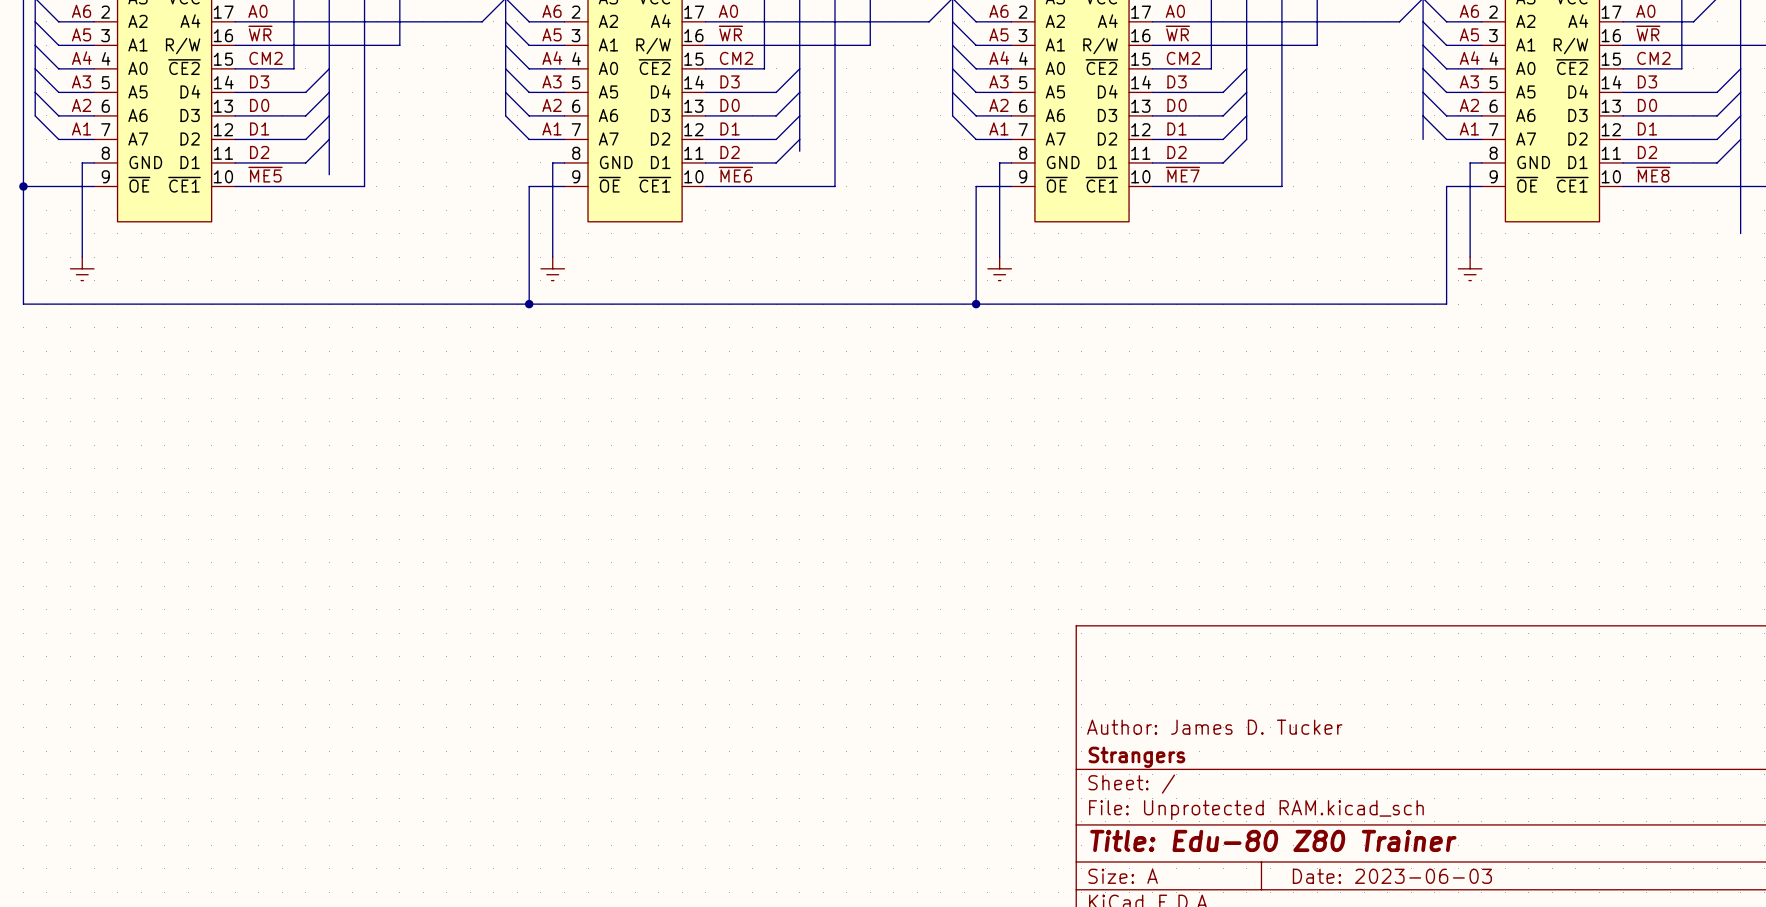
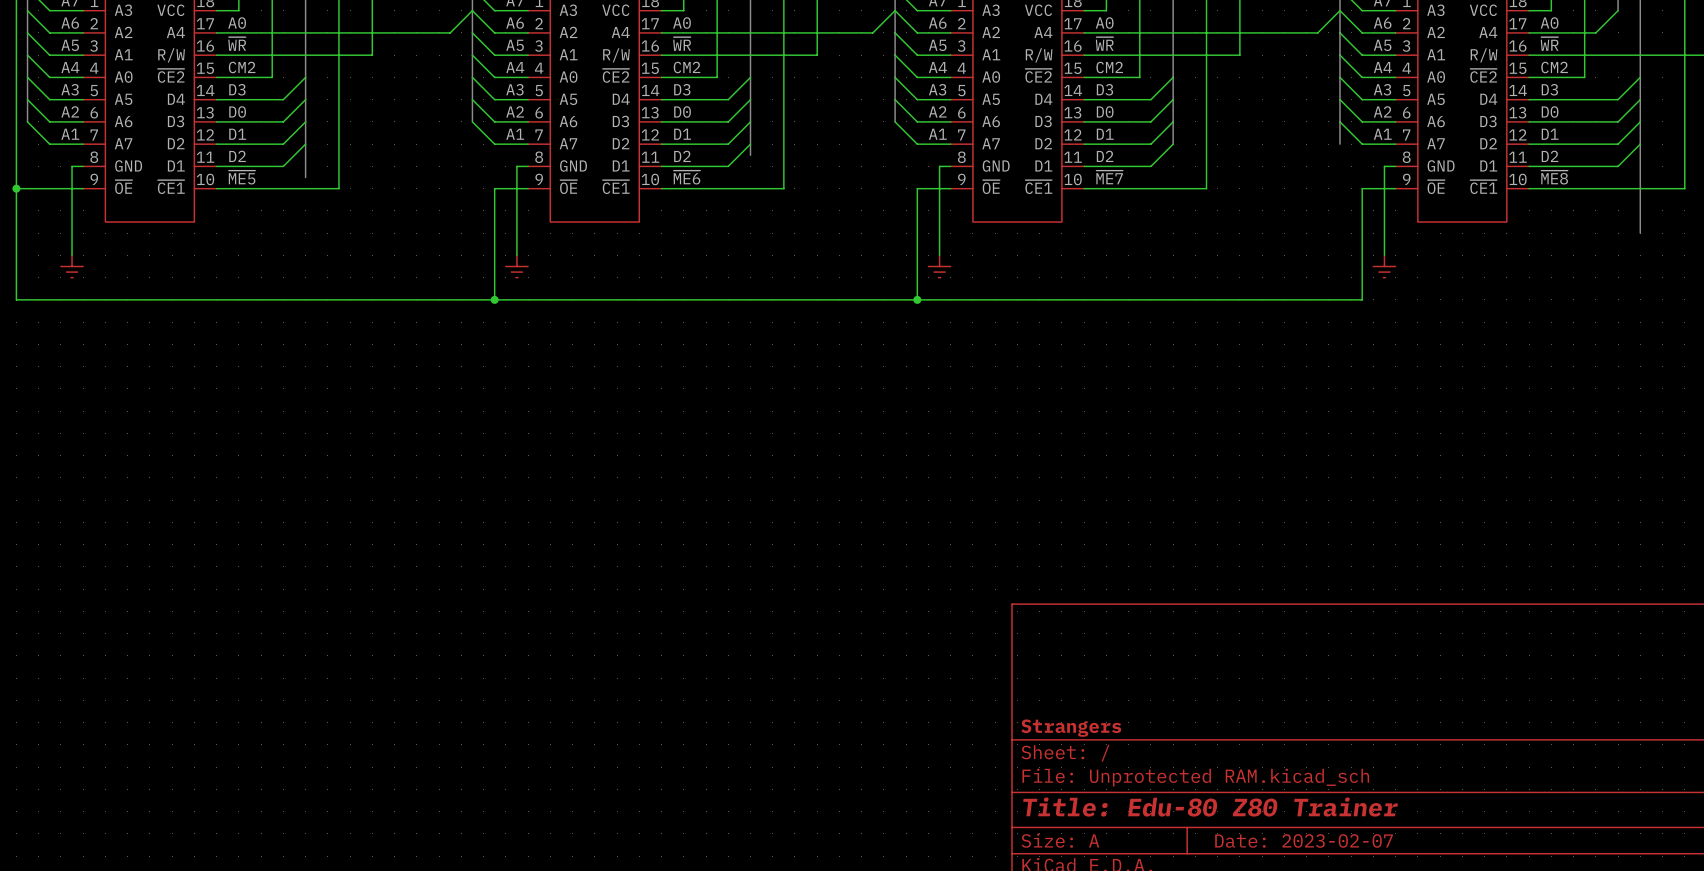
title block: Author: James D. Tucker (1214, 727) -> none
title block: Date: 2023-06-03 (1392, 876) -> Date: 2023-02-07 (1304, 840)

